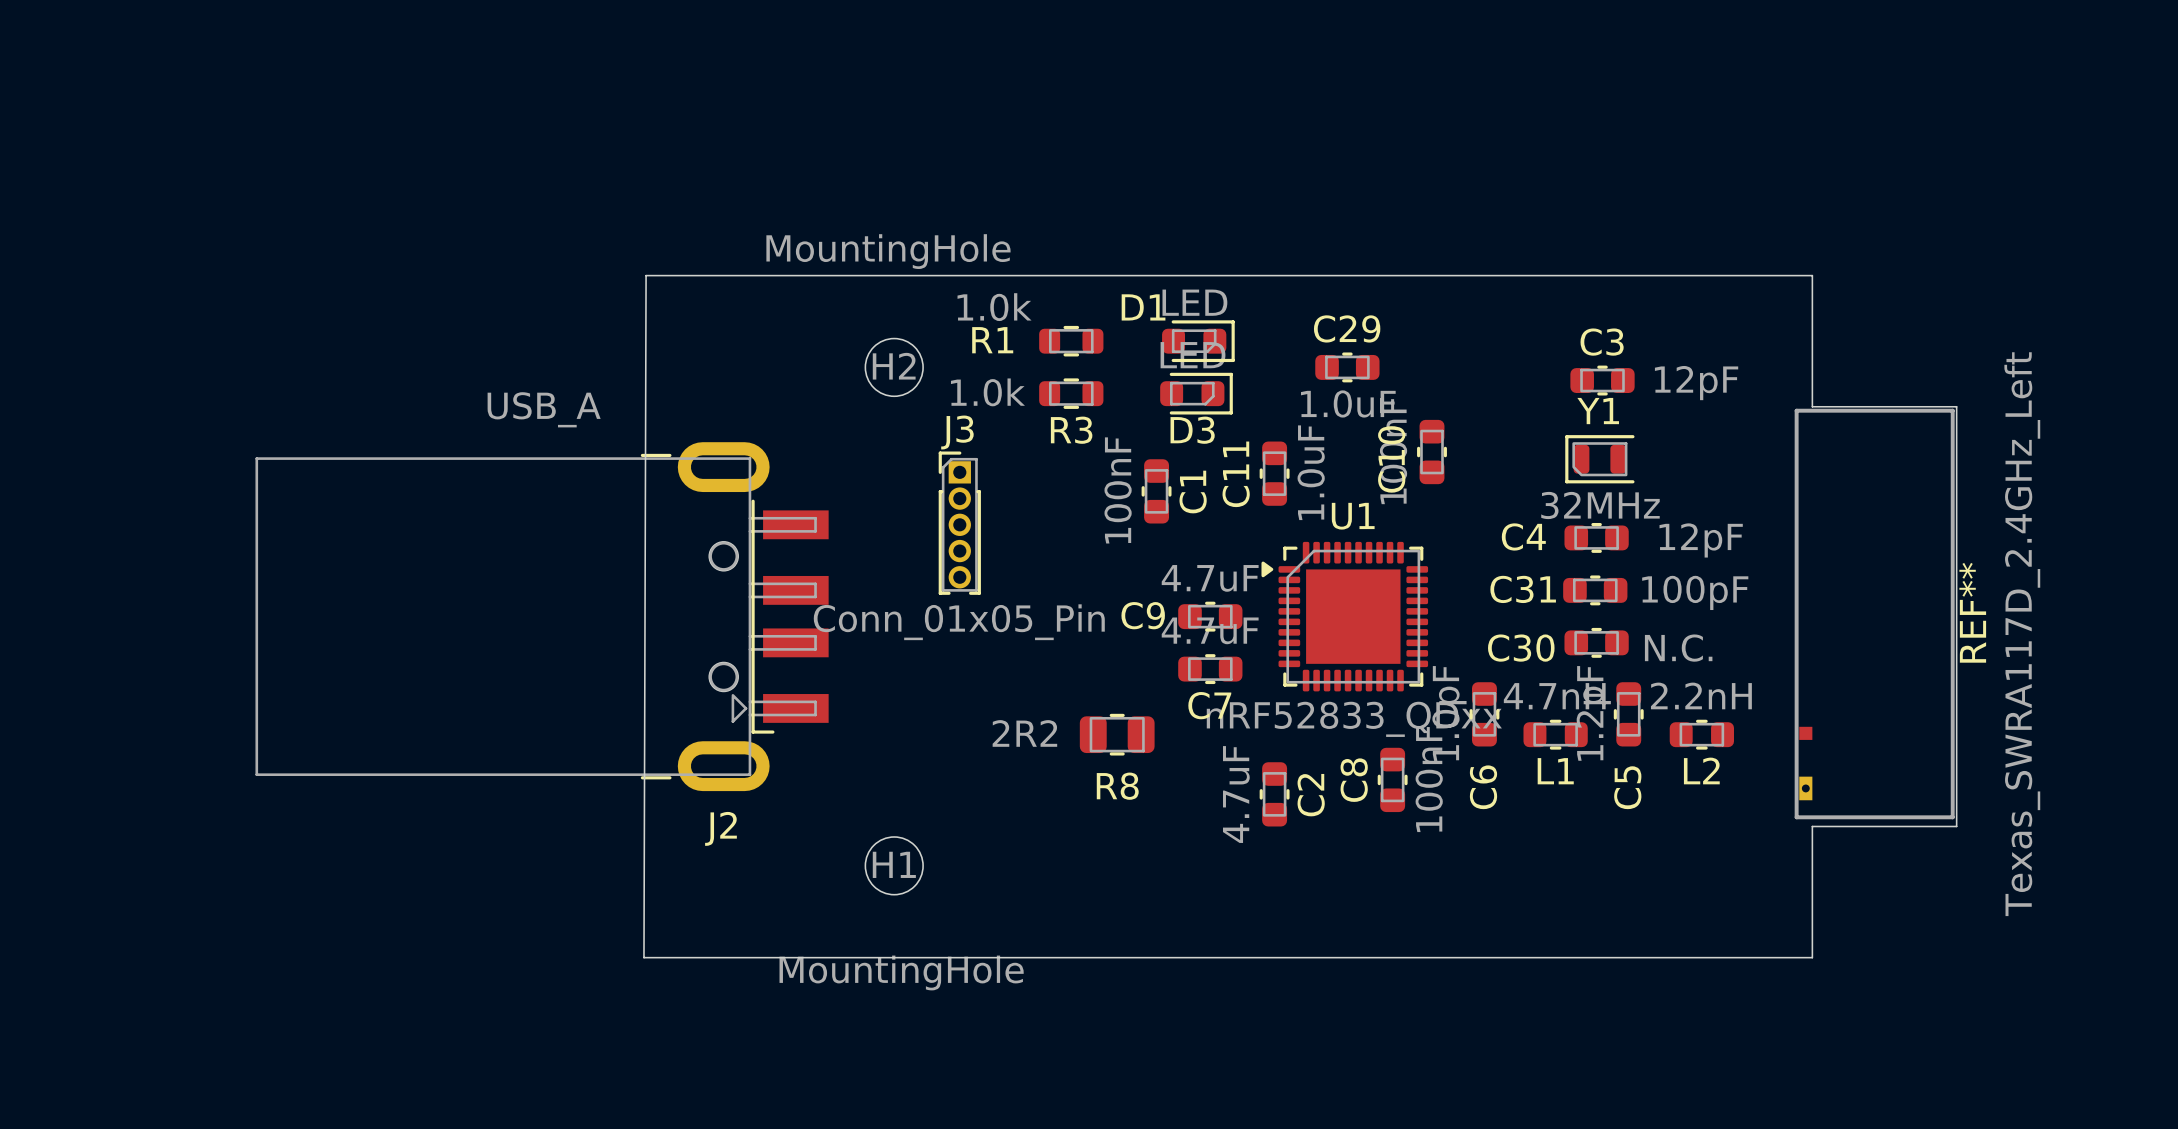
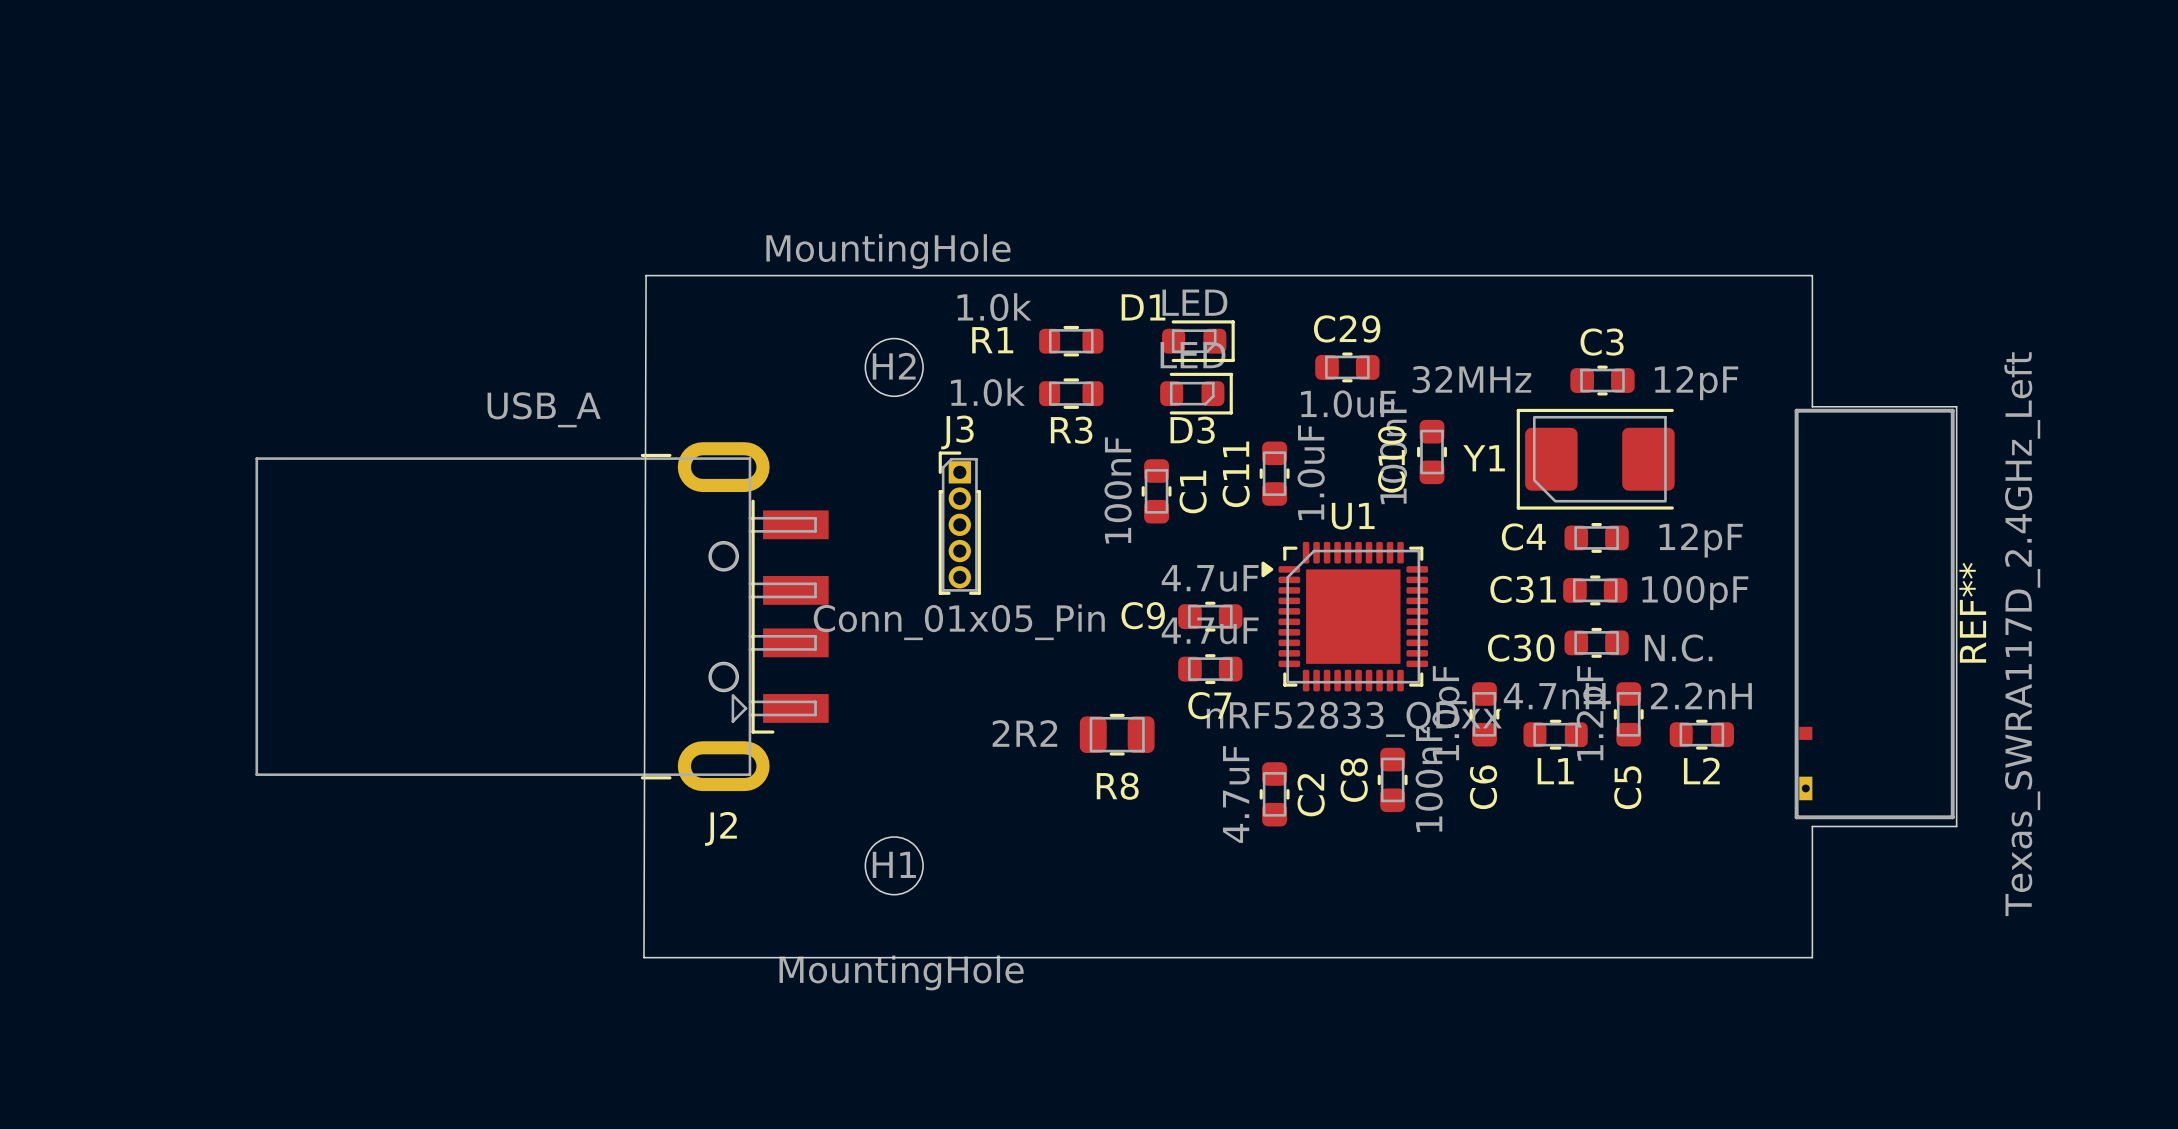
Y1 name position: Y1 (1598, 411) -> Y1 (1484, 458)
Y1 footprint: [1565, 435, 1635, 484] -> [1516, 408, 1675, 510]
Y1 value position: 32MHz (1600, 505) -> 32MHz (1471, 379)

